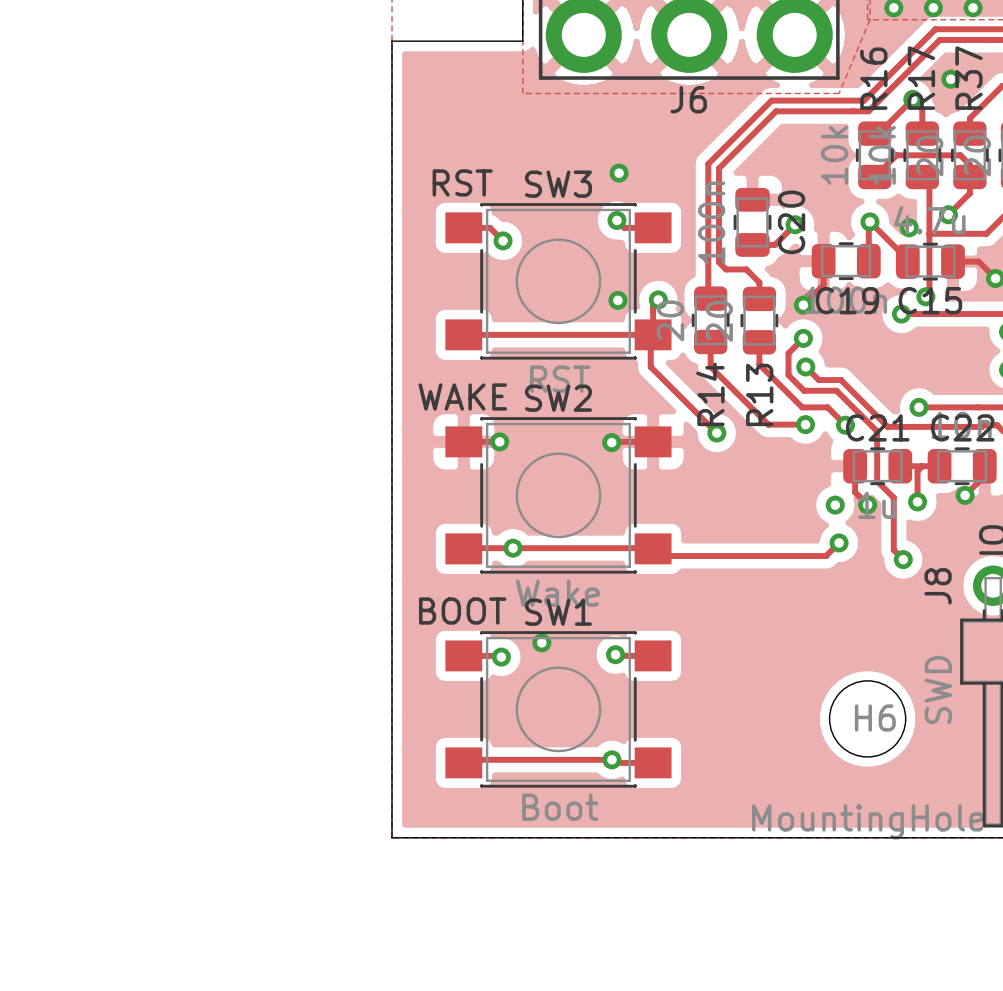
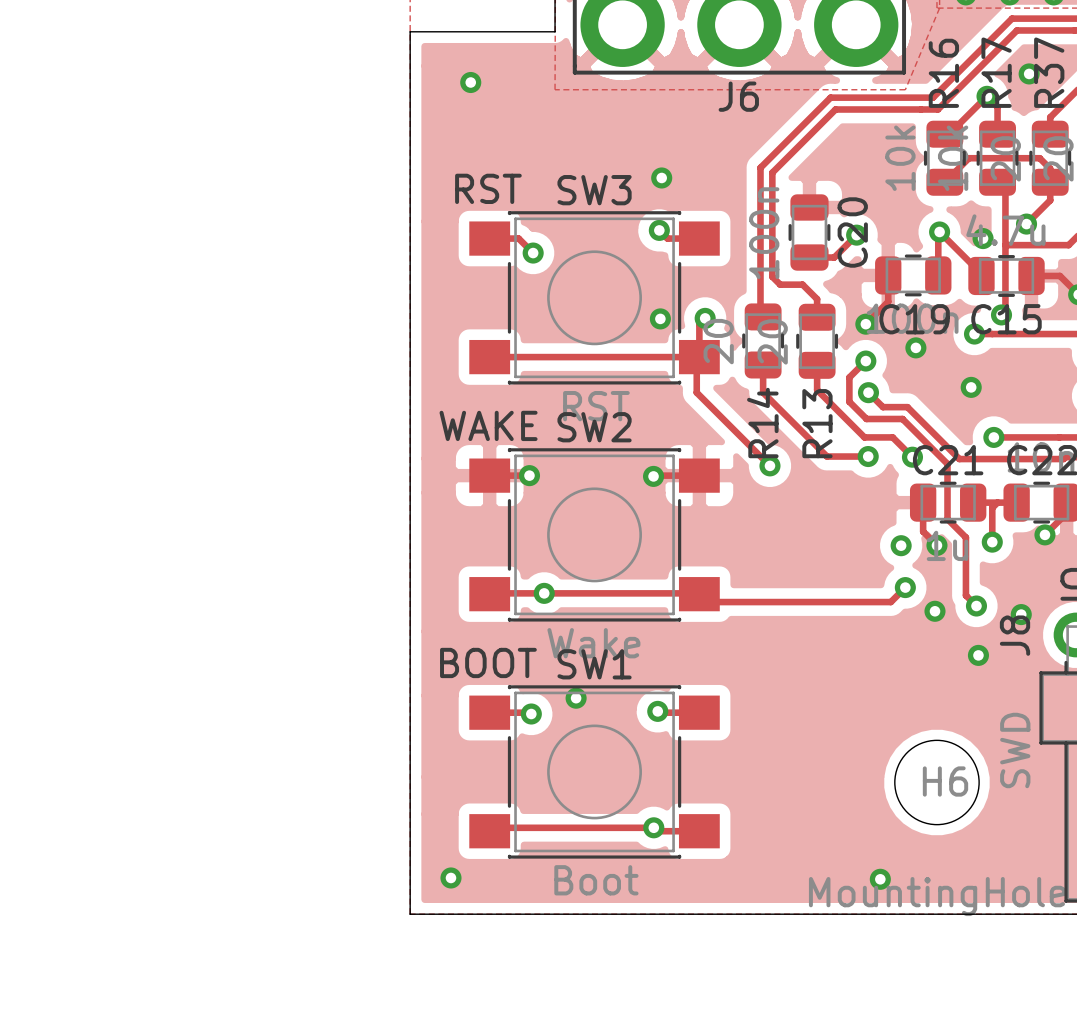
via: none -> (470, 82)
via: none -> (915, 347)
via: none -> (971, 387)
via: none -> (934, 611)
via: none -> (1021, 614)
via: none -> (978, 655)
via: none -> (450, 877)
via: none -> (880, 879)

